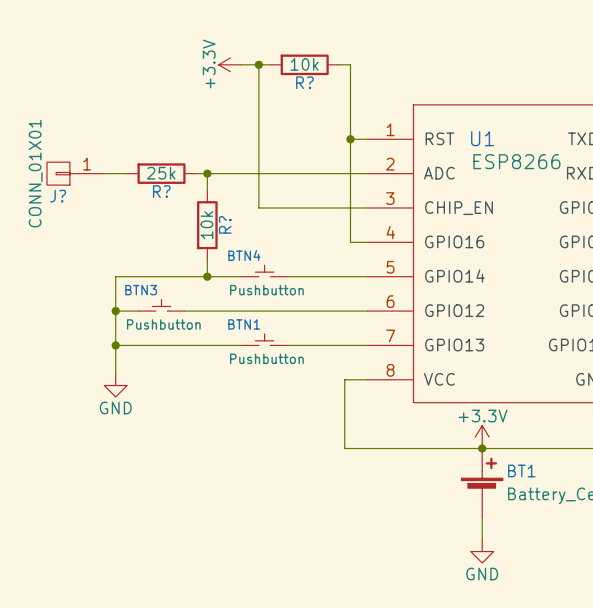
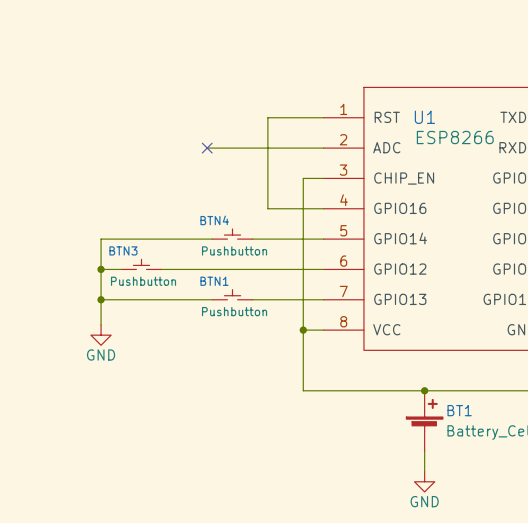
power symbol: +3.3V (230, 64) -> none
wire: (241, 64) (270, 64) -> none
wire: (258, 64) (258, 207) (344, 207) -> (303, 330) (303, 178)
junction: (258, 64) -> none
R?: 10k (304, 64) -> none
wire: (339, 64) (350, 64) (350, 242) -> (308, 117) (267, 117) (267, 208) (308, 208)
junction: (350, 139) -> none
J?: CONN_01X01 (75, 173) -> none
wire: (104, 173) (127, 173) -> none
R?: 25k (161, 173) -> none
wire: (195, 173) (235, 173) -> none
wire: (207, 173) (207, 190) -> none
junction: (207, 173) -> none
no-connect mark: none -> (207, 148)
R?: 10k (207, 225) -> none
wire: (207, 259) (207, 276) -> none
junction: (207, 276) -> none
junction: none -> (303, 330)
power symbol: +3.3V (482, 437) -> none

